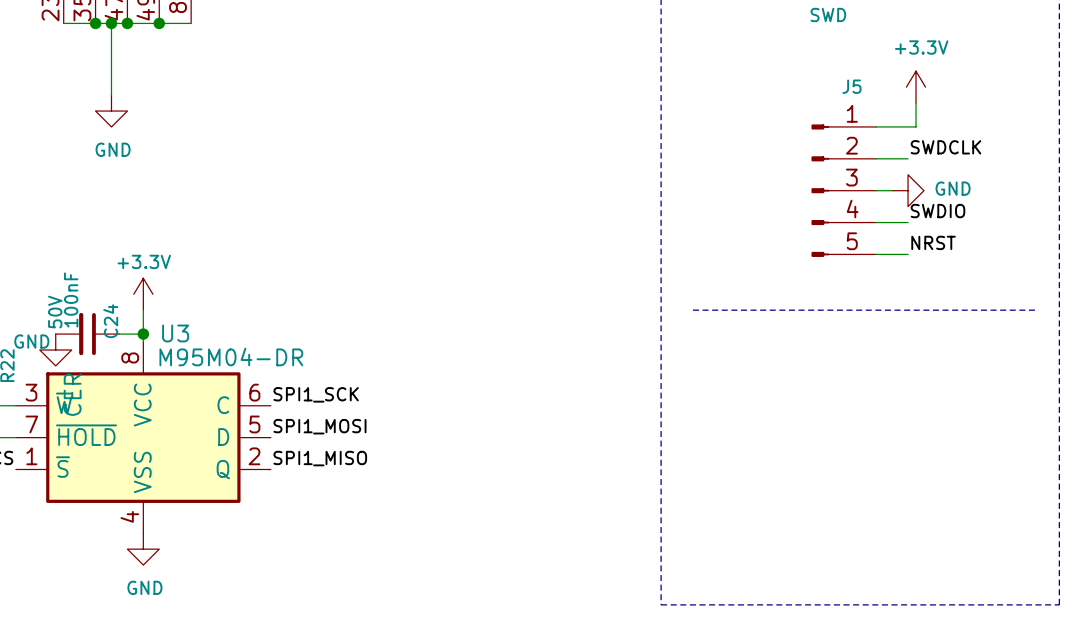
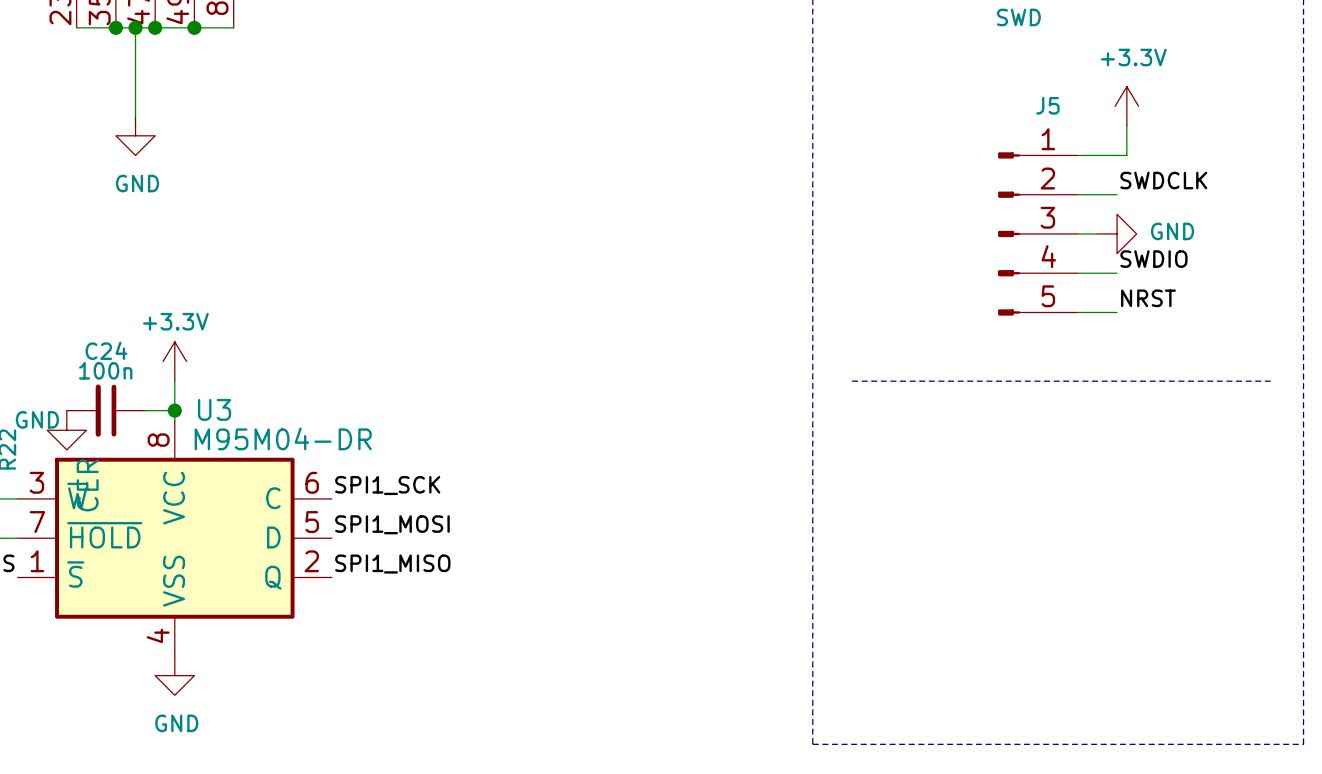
C24 text: 100nF (71, 300) -> none
C24 value: none -> 100n (105, 370)
C24 text: 50V (55, 312) -> none
C24 name rotation: 0° (110, 321) -> 90° clockwise (106, 350)
C24 name position: C24 (110, 321) -> C24 (106, 350)

